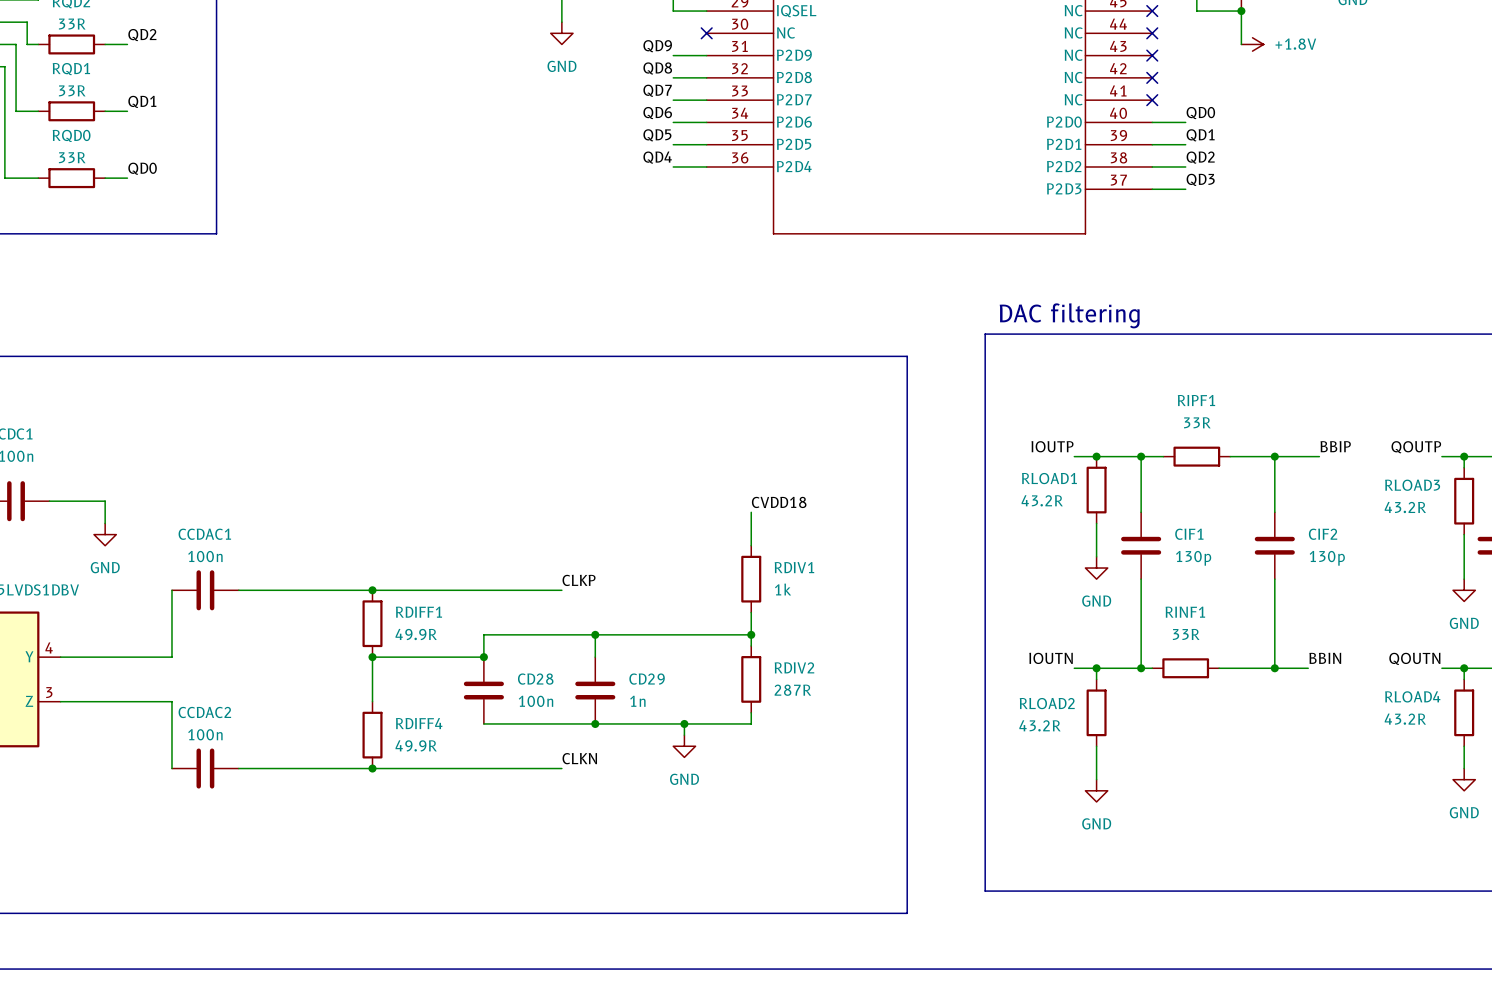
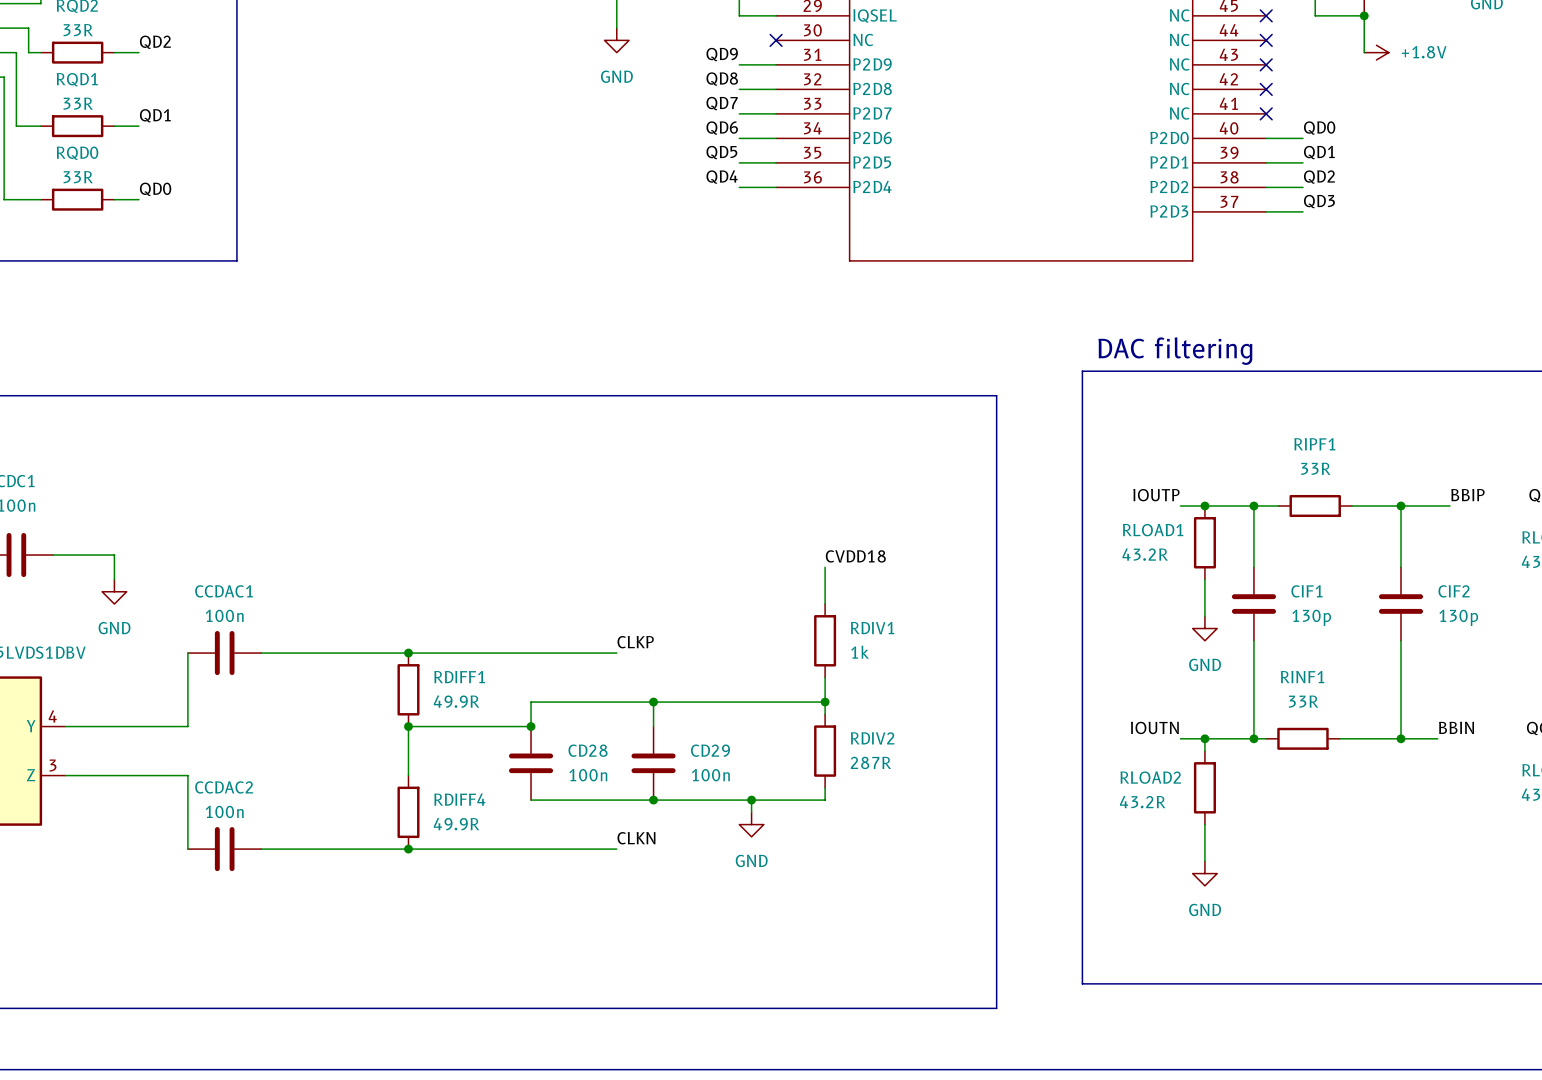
CD29 value: 1n (637, 701) -> 100n (710, 775)

